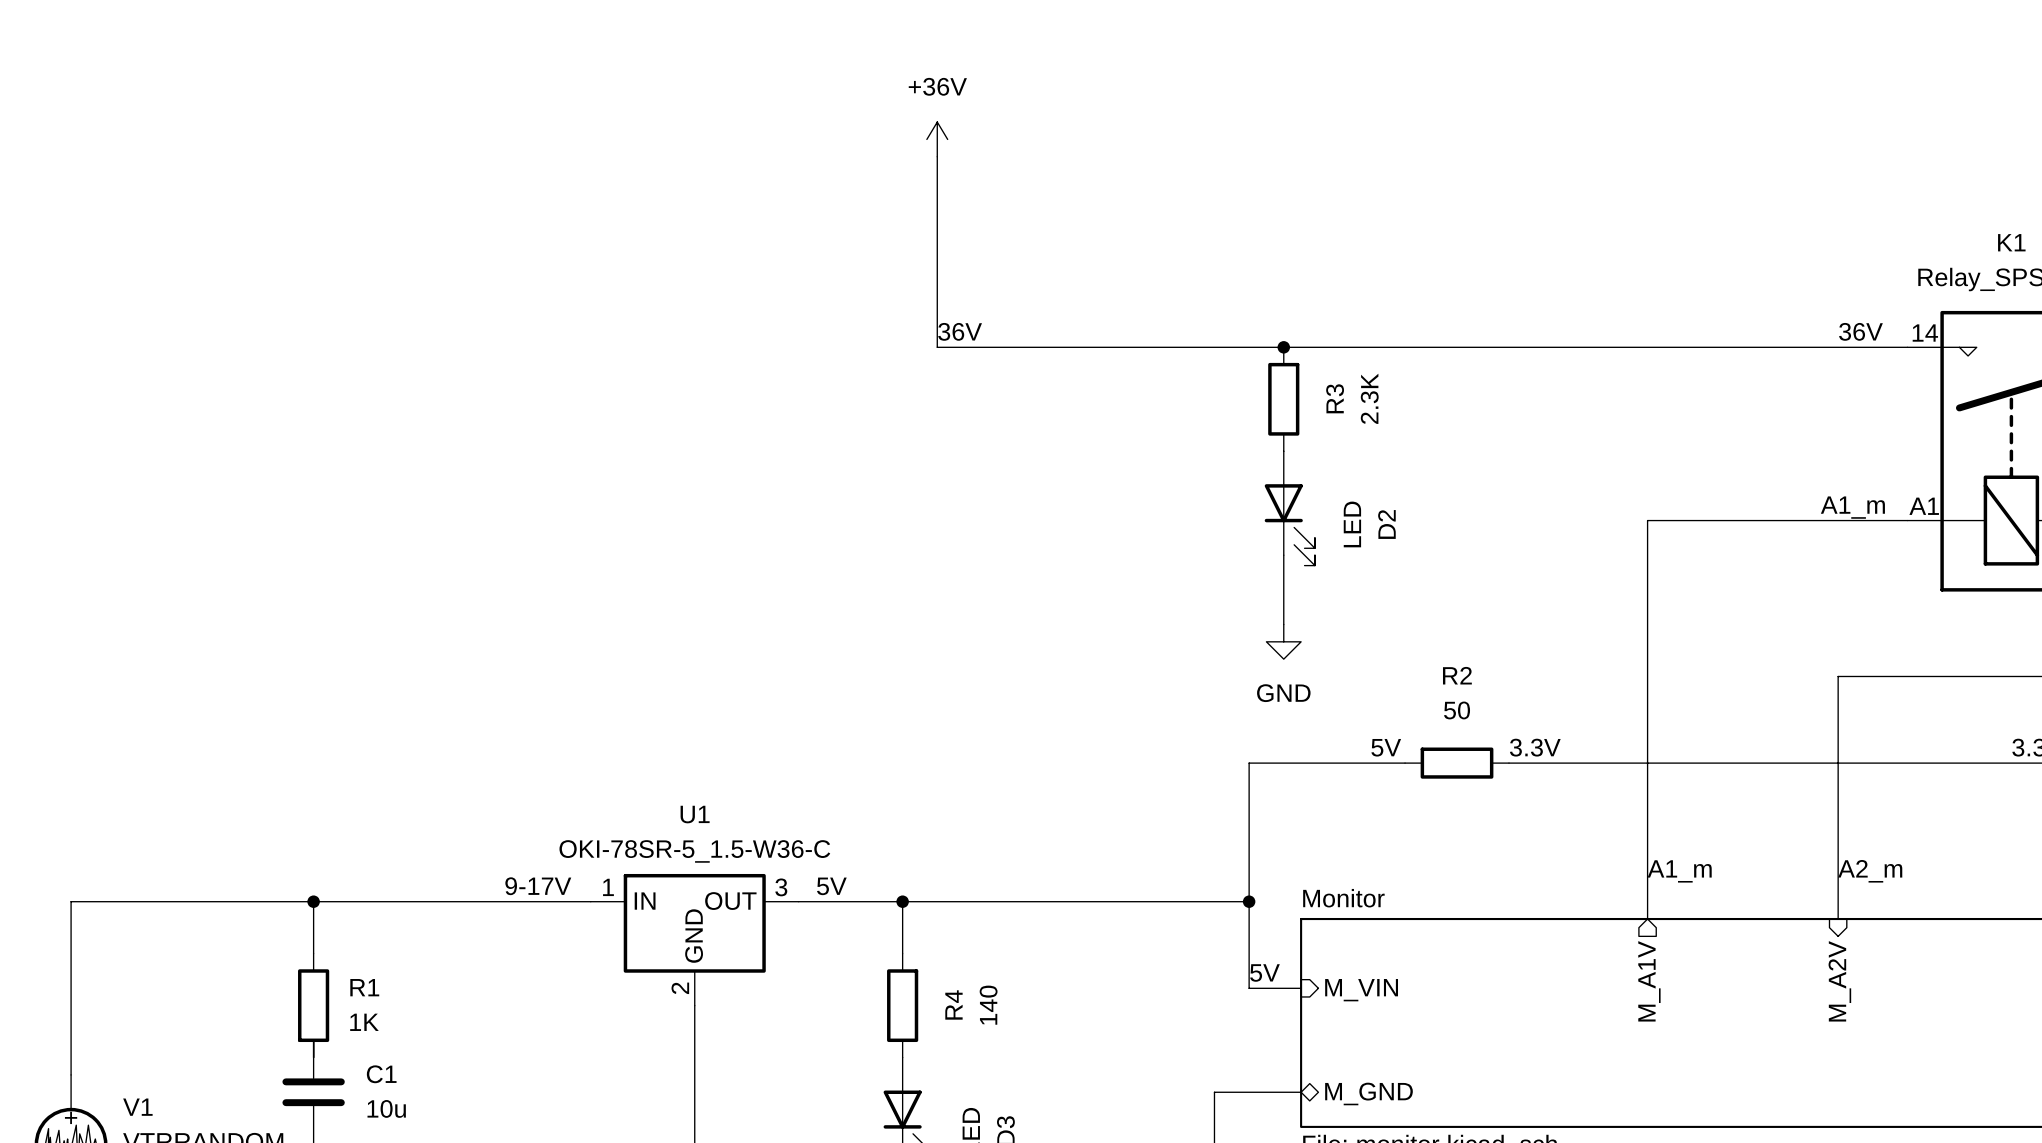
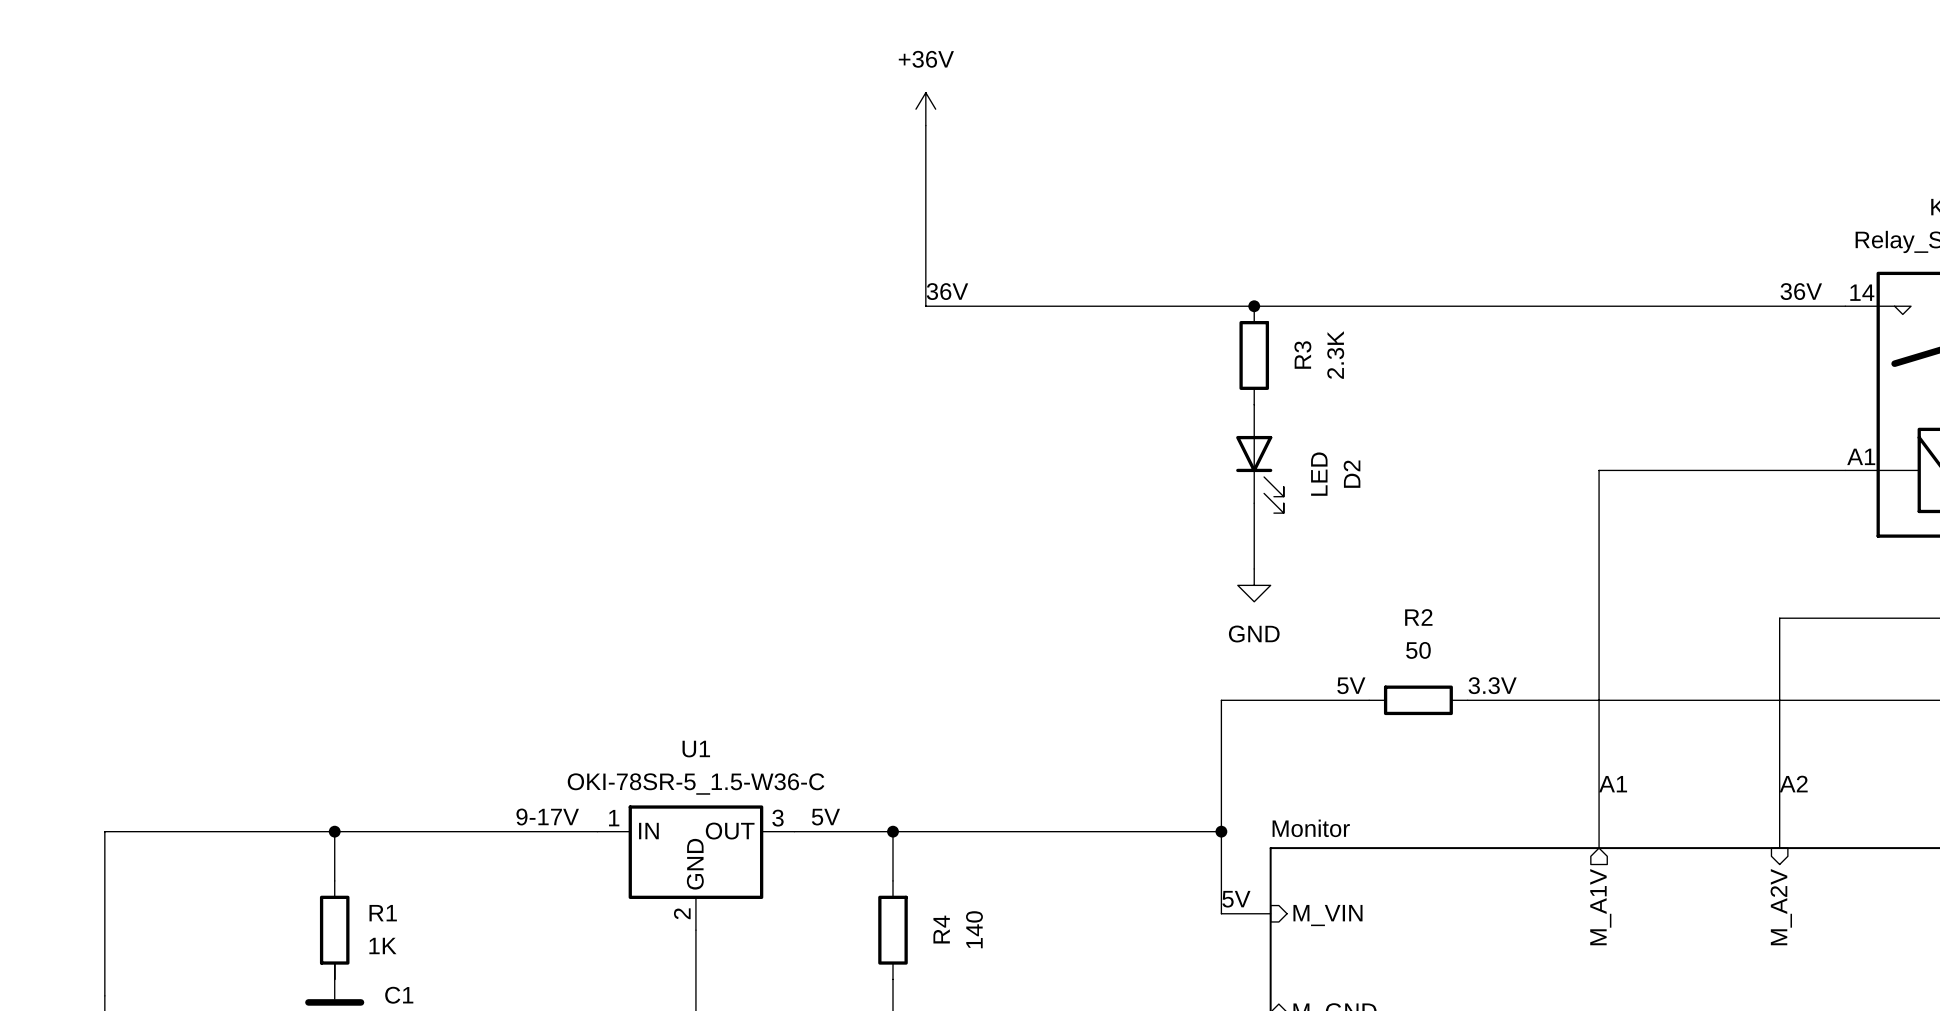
label: A1_m (1852, 507) -> none
label: A1_m (1679, 871) -> A1 (1613, 784)
label: A2_m (1870, 871) -> A2 (1793, 784)

